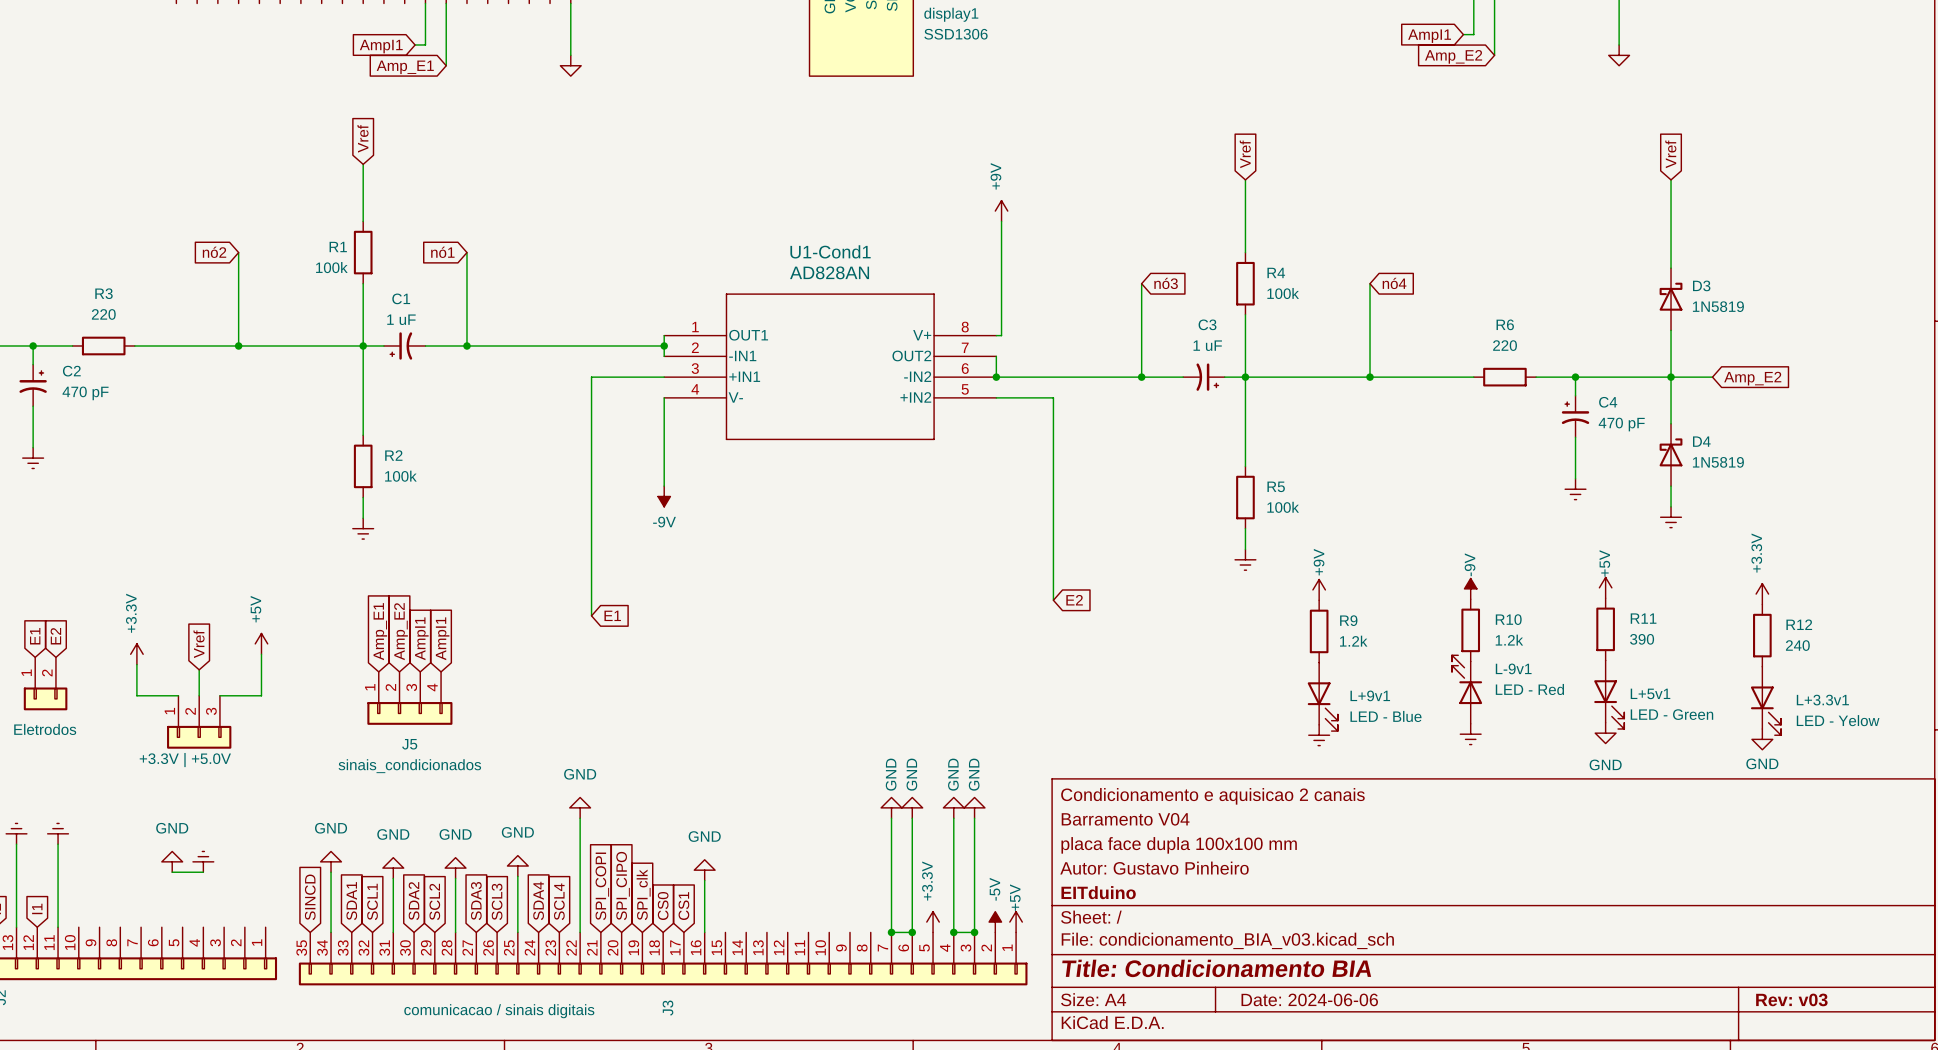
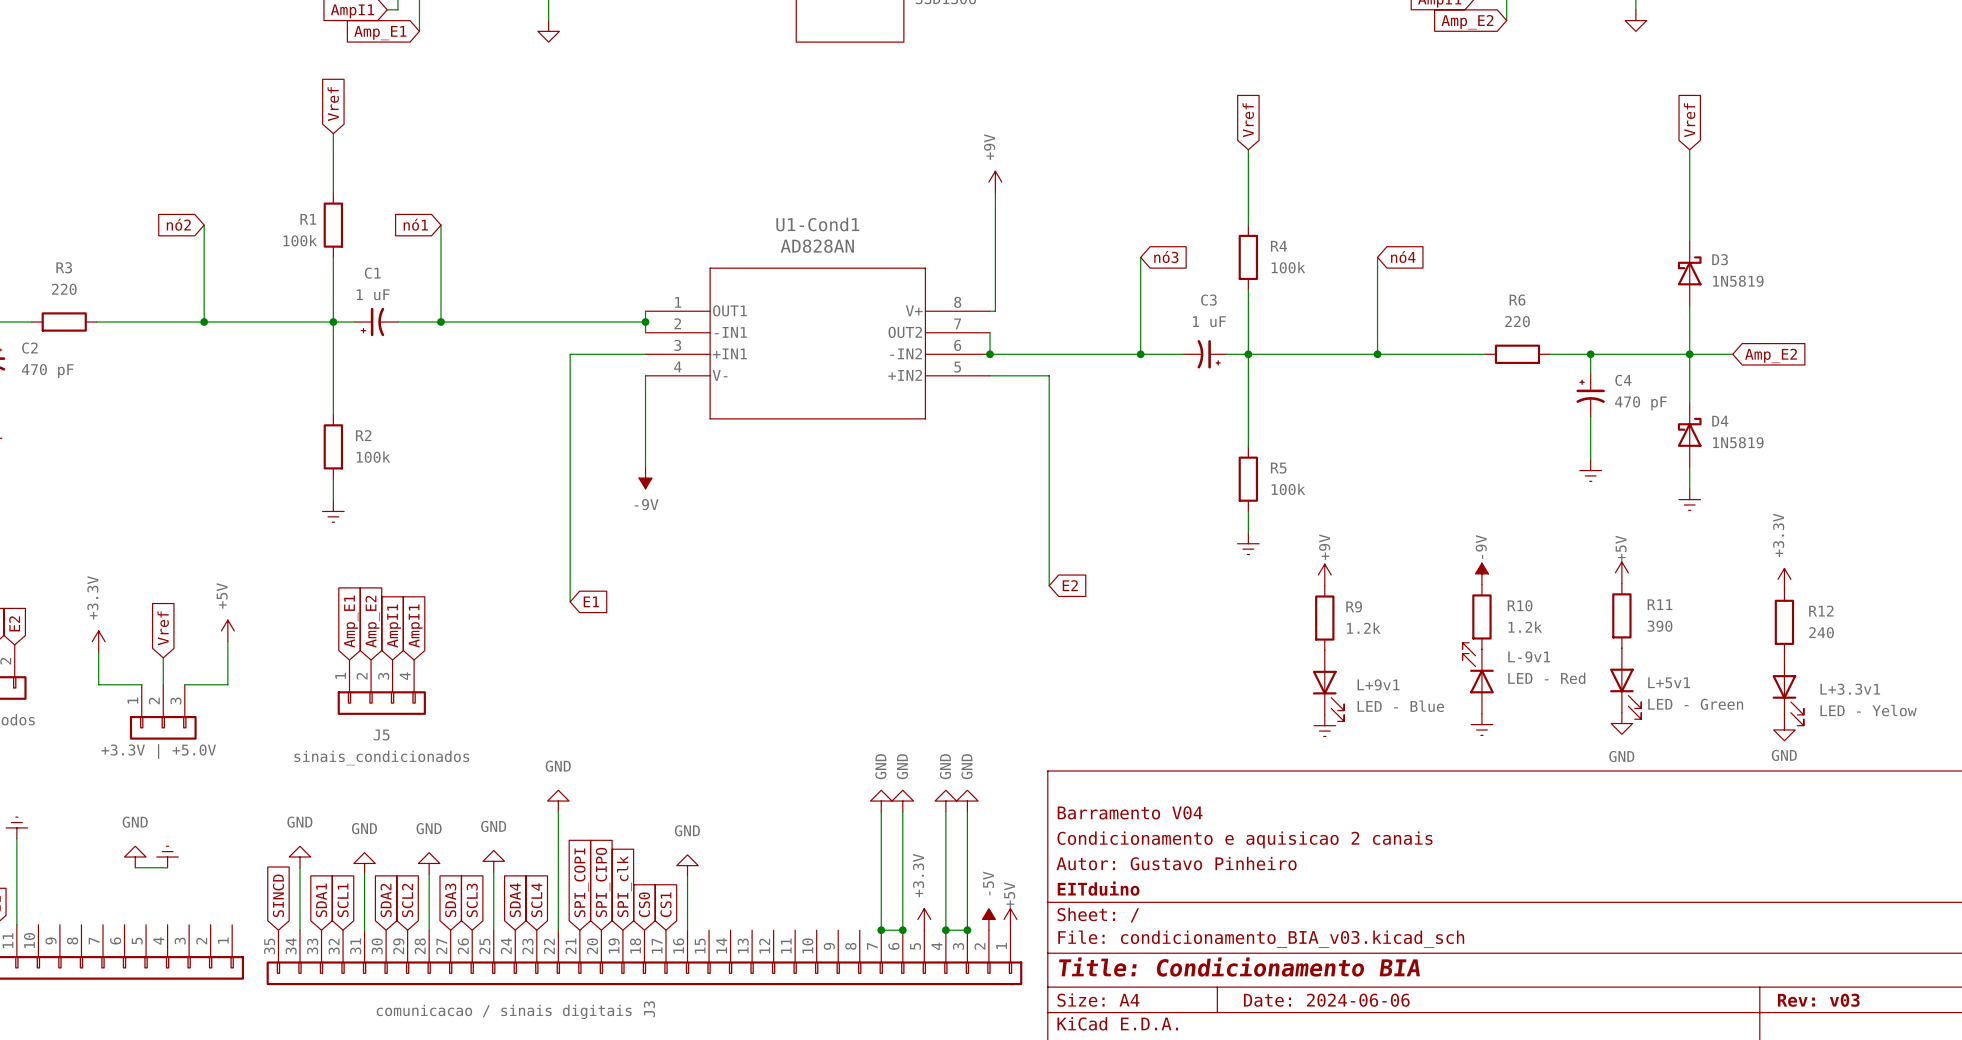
title block: Condicionamento e aquisicao 2 canais (1212, 796) -> none
title block: placa face dupla 100x100 mm (1179, 845) -> Condicionamento e aquisicao 2 canais (1245, 839)

